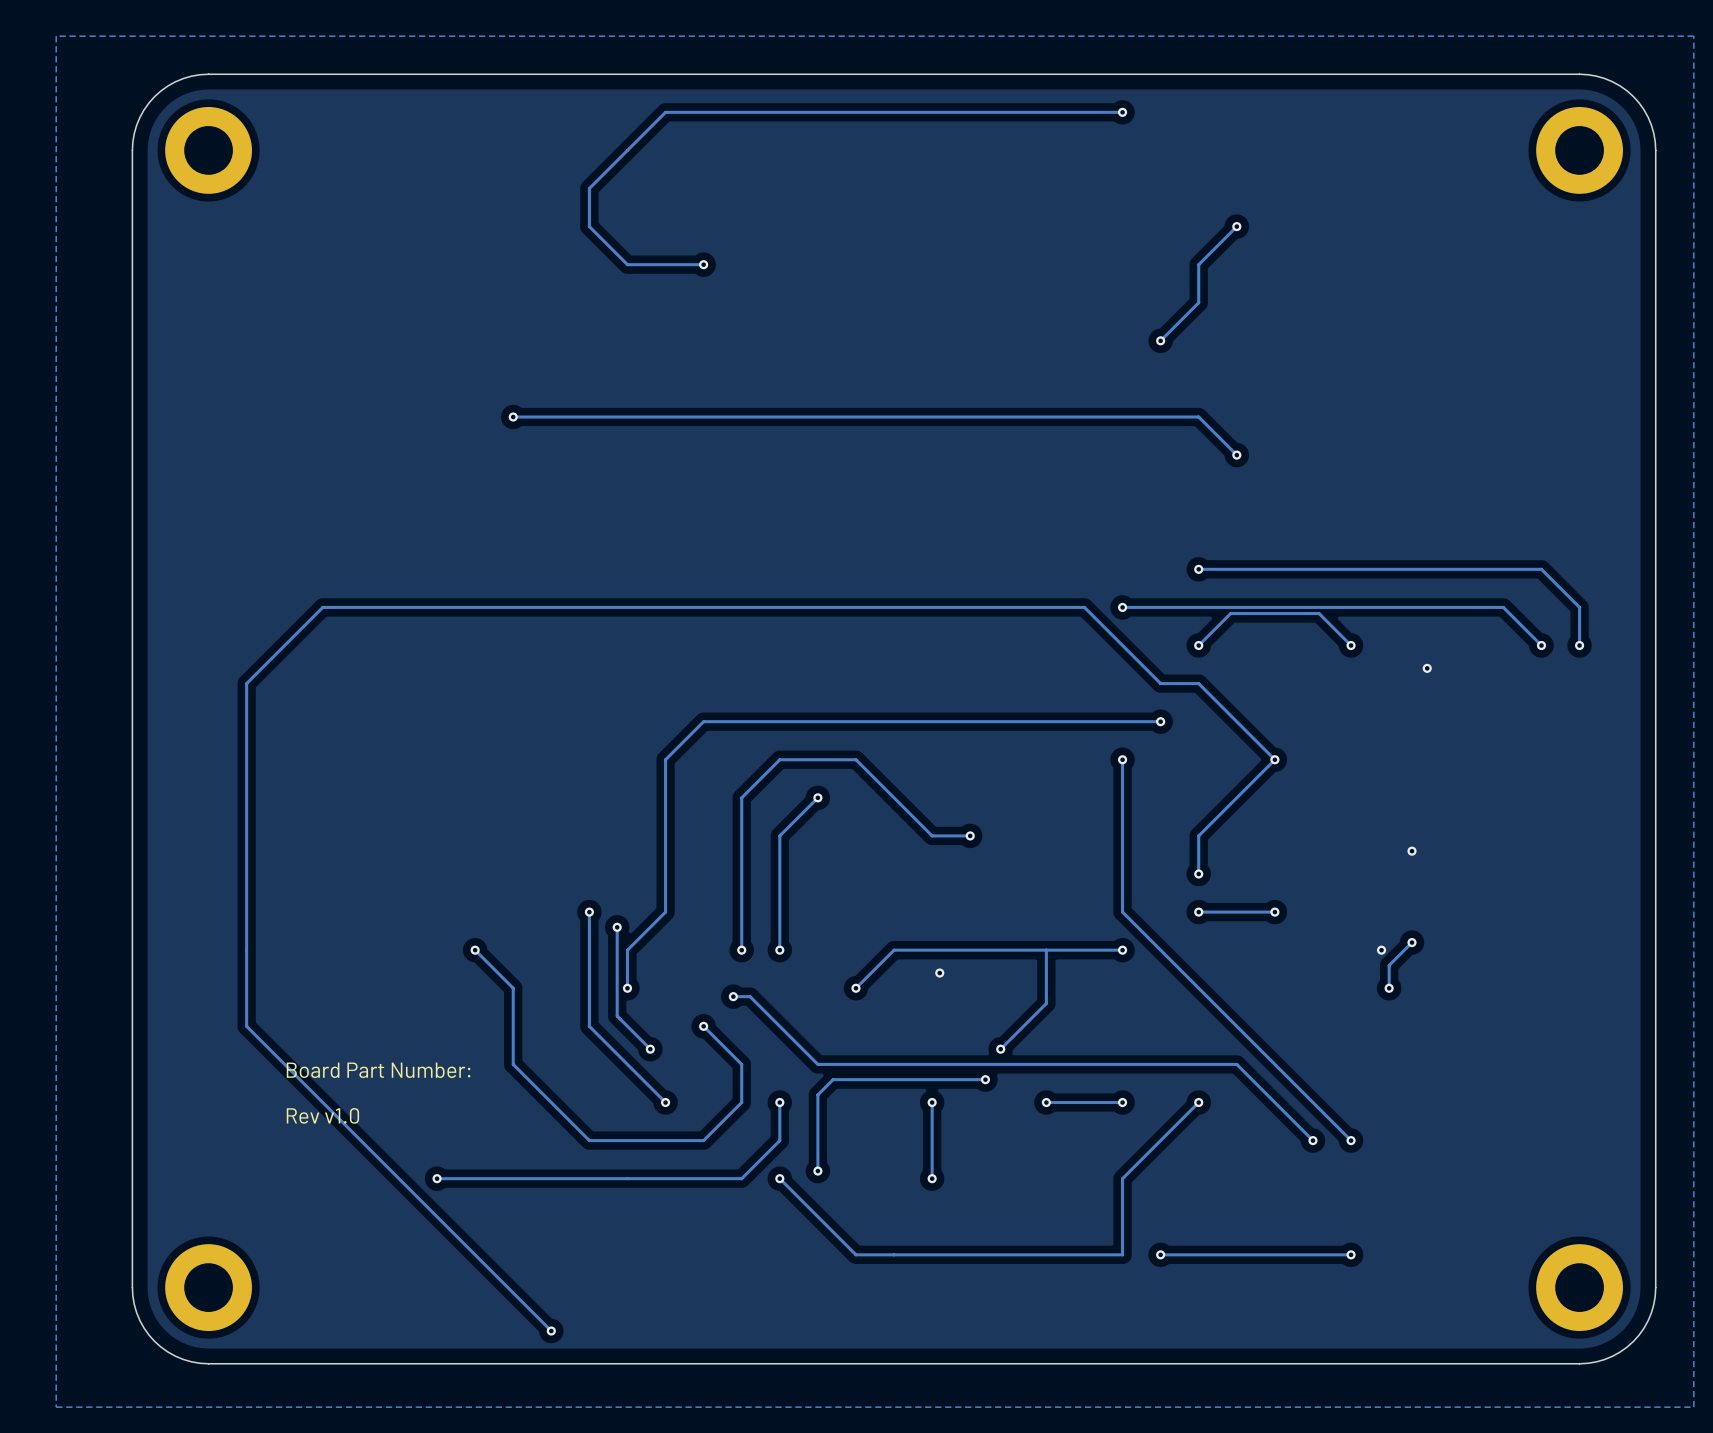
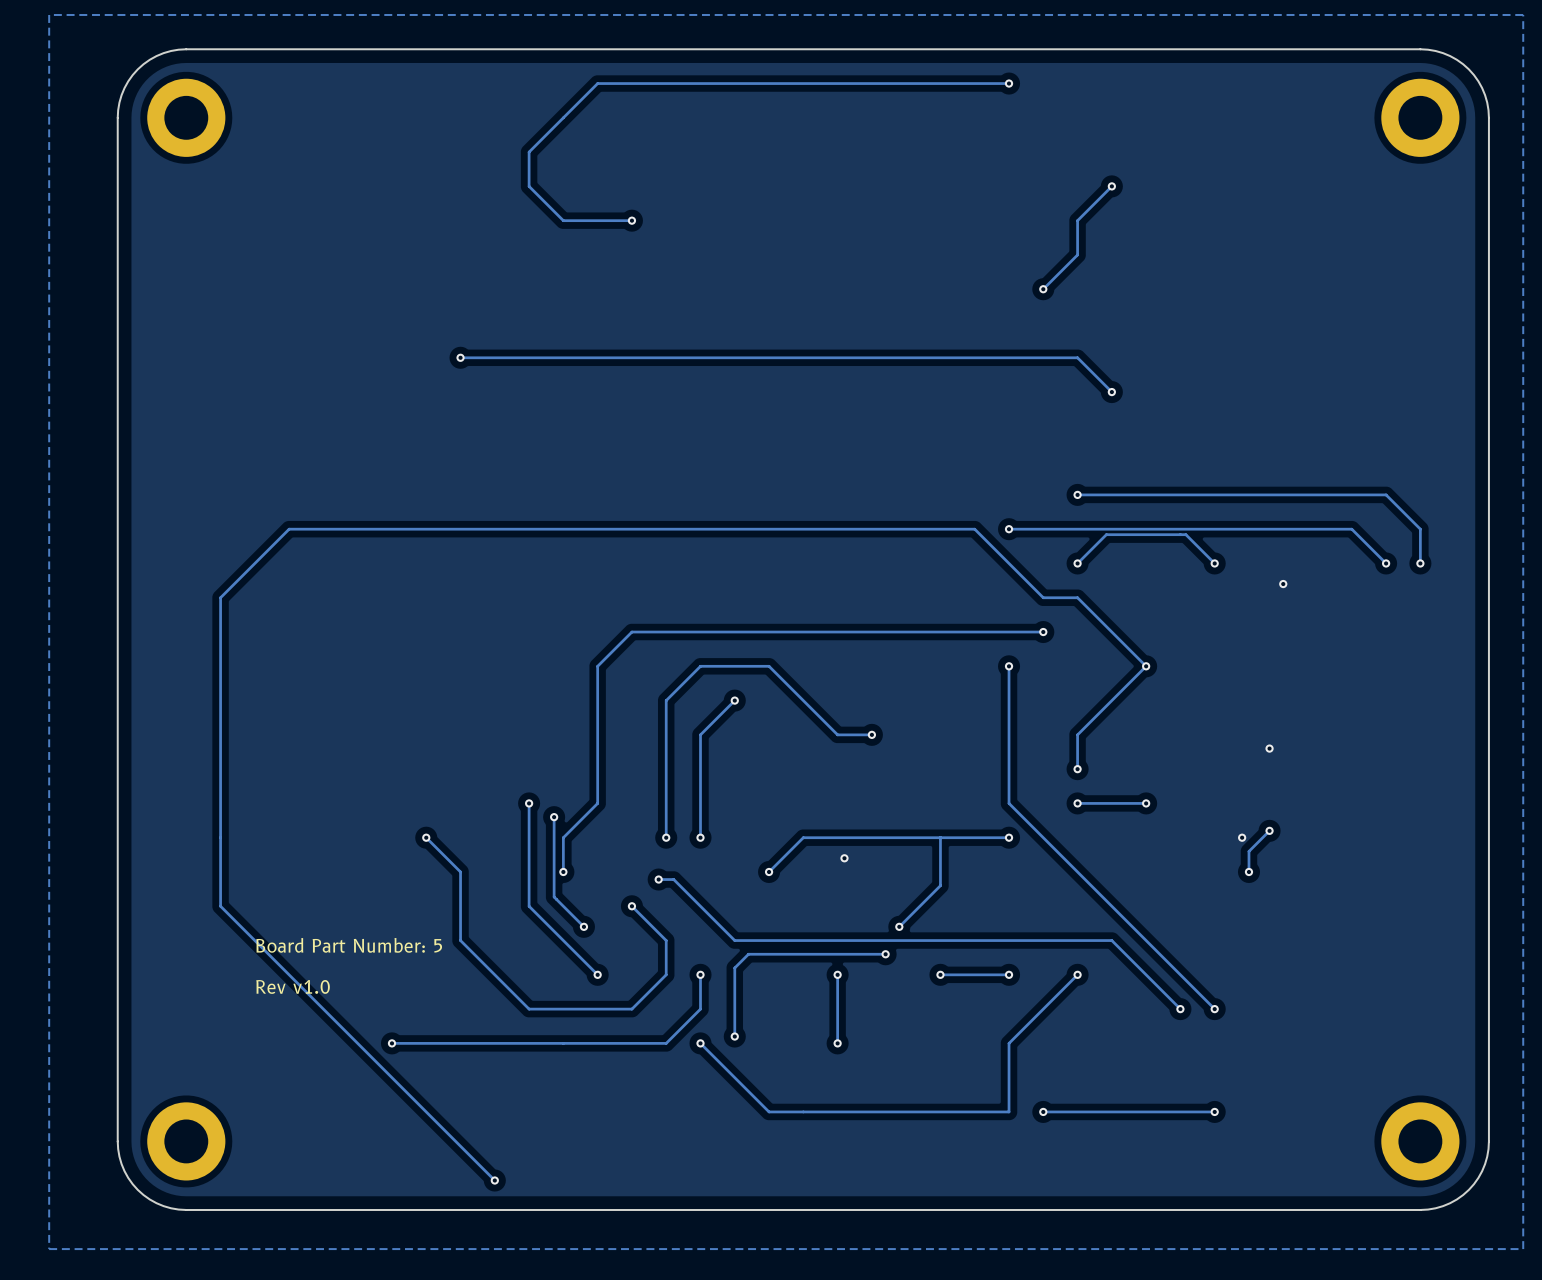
text: Board Part Number: (378, 1070) -> Board Part Number: 5 (349, 945)

